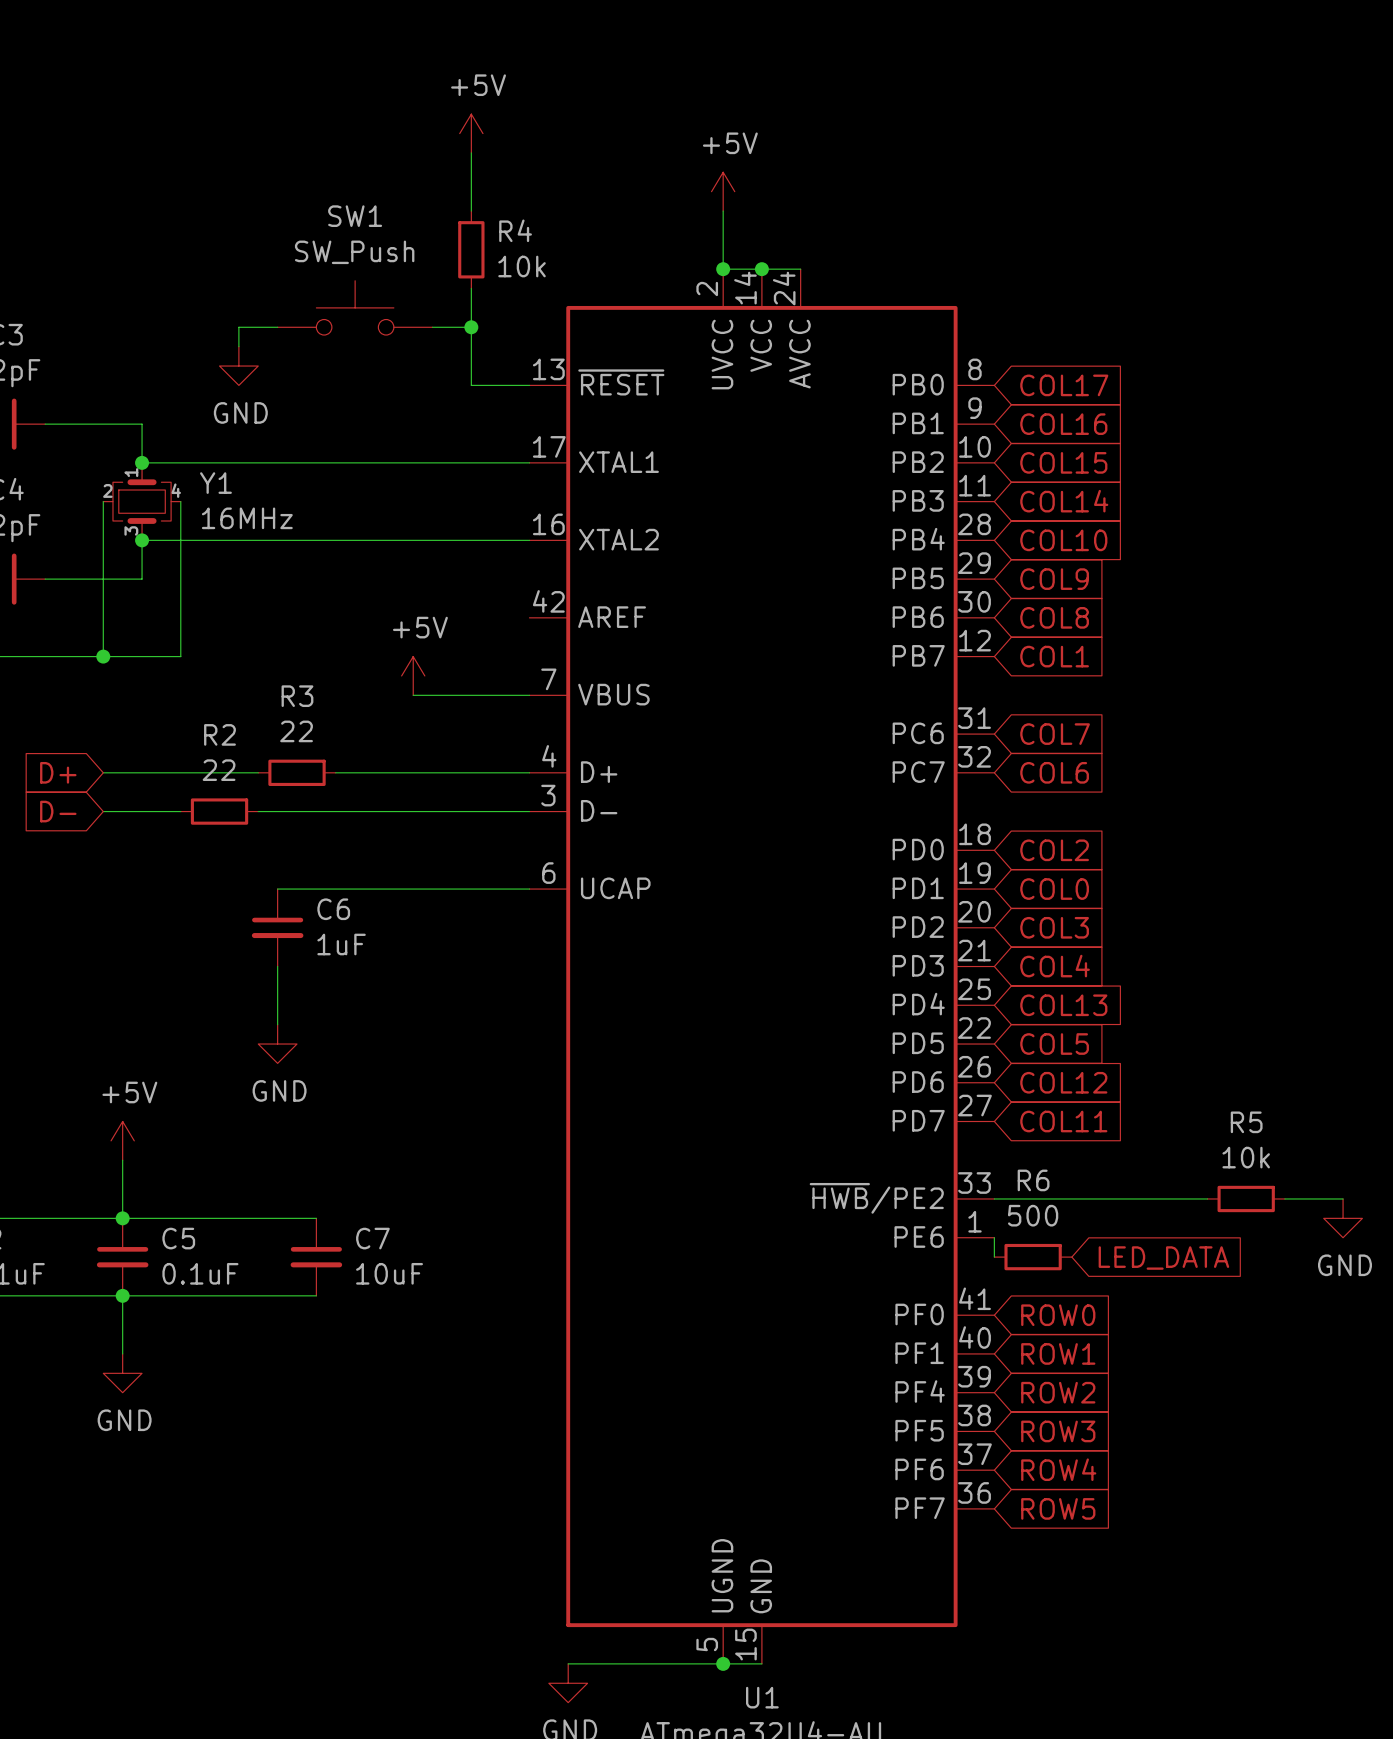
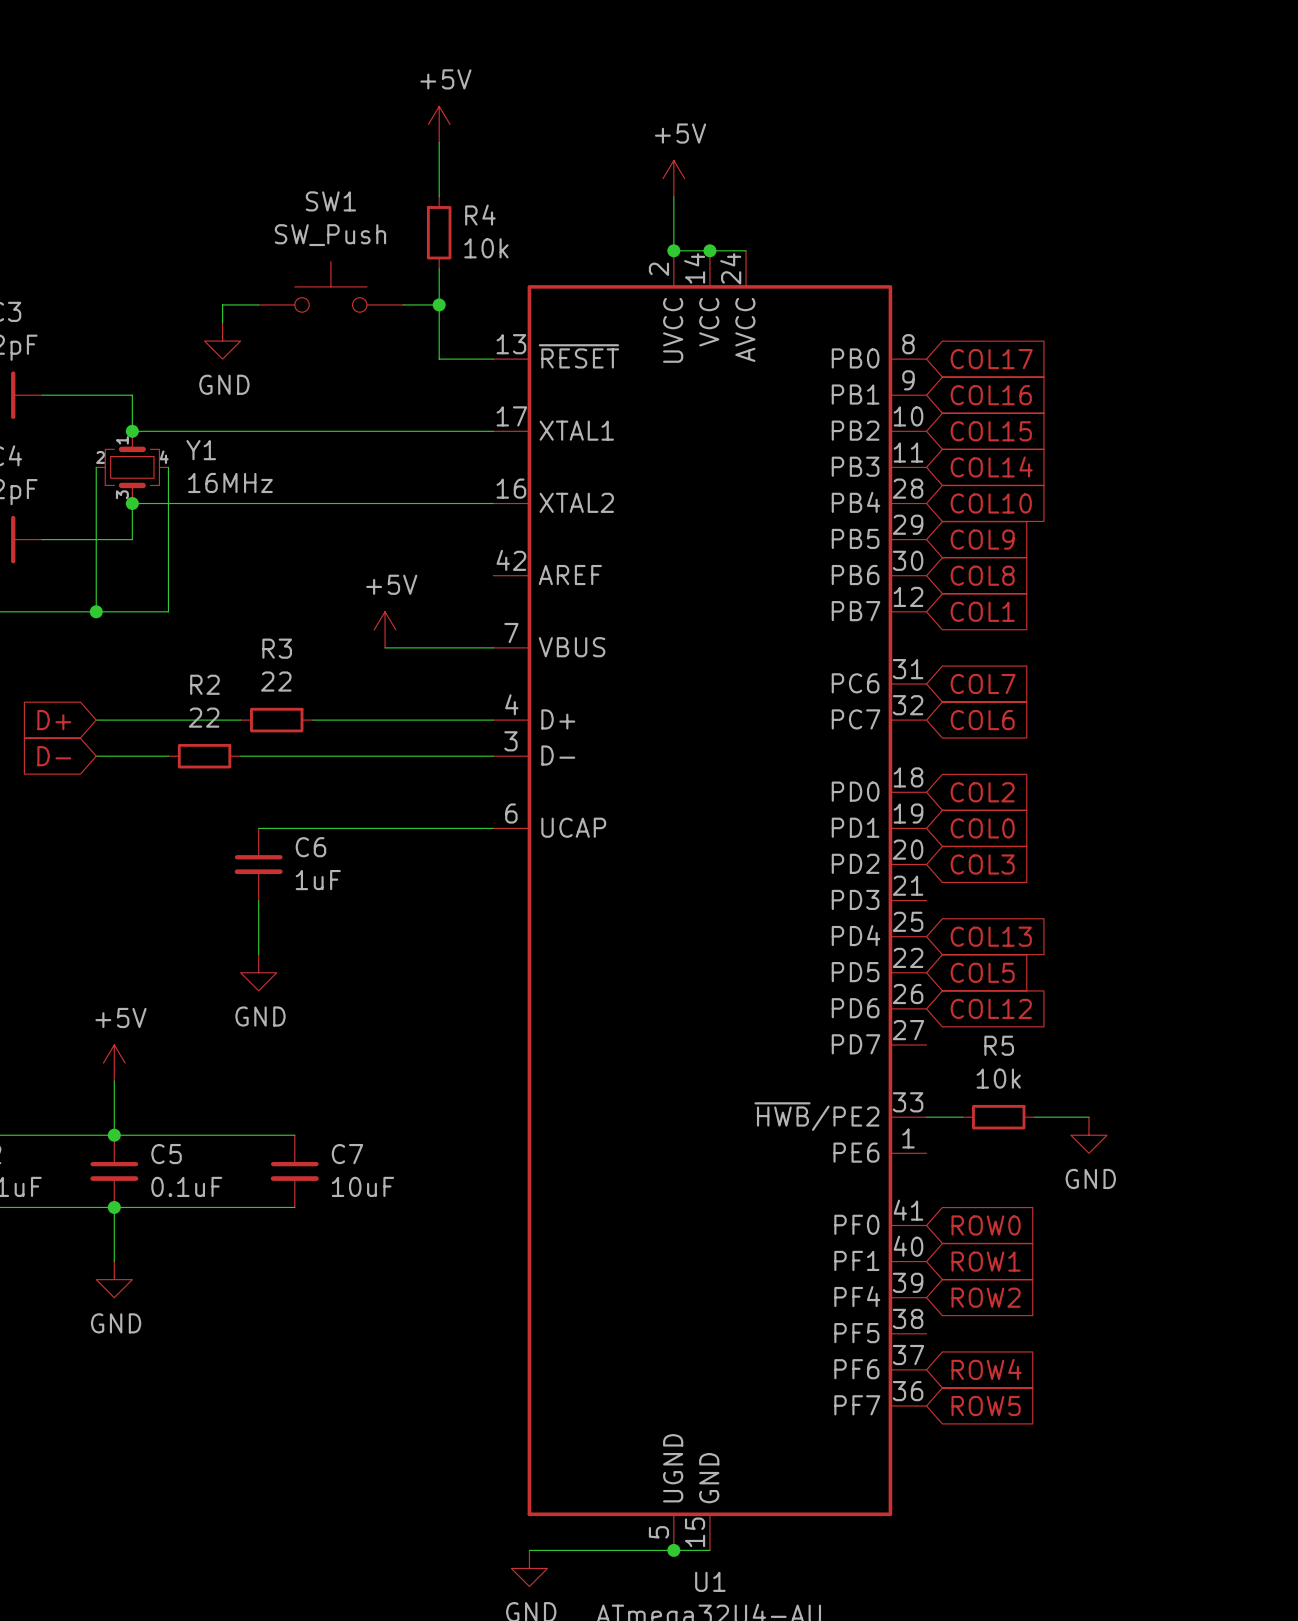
global label: COL4 (1055, 966) -> none
global label: COL11 (1063, 1121) -> none
wire: (1033, 1198) (1110, 1198) -> none
wire: (1168, 1198) (1207, 1198) -> none
R5 position: (1246, 1198) -> (998, 1117)
wire: (1284, 1198) (1343, 1198) -> none
power symbol position: GND (1343, 1218) -> GND (1088, 1135)
wire: (994, 1237) (994, 1257) -> none
R6: 500 (1033, 1257) -> none
global label: LED_DATA (1163, 1258) -> none
global label: ROW3 (1058, 1431) -> none

